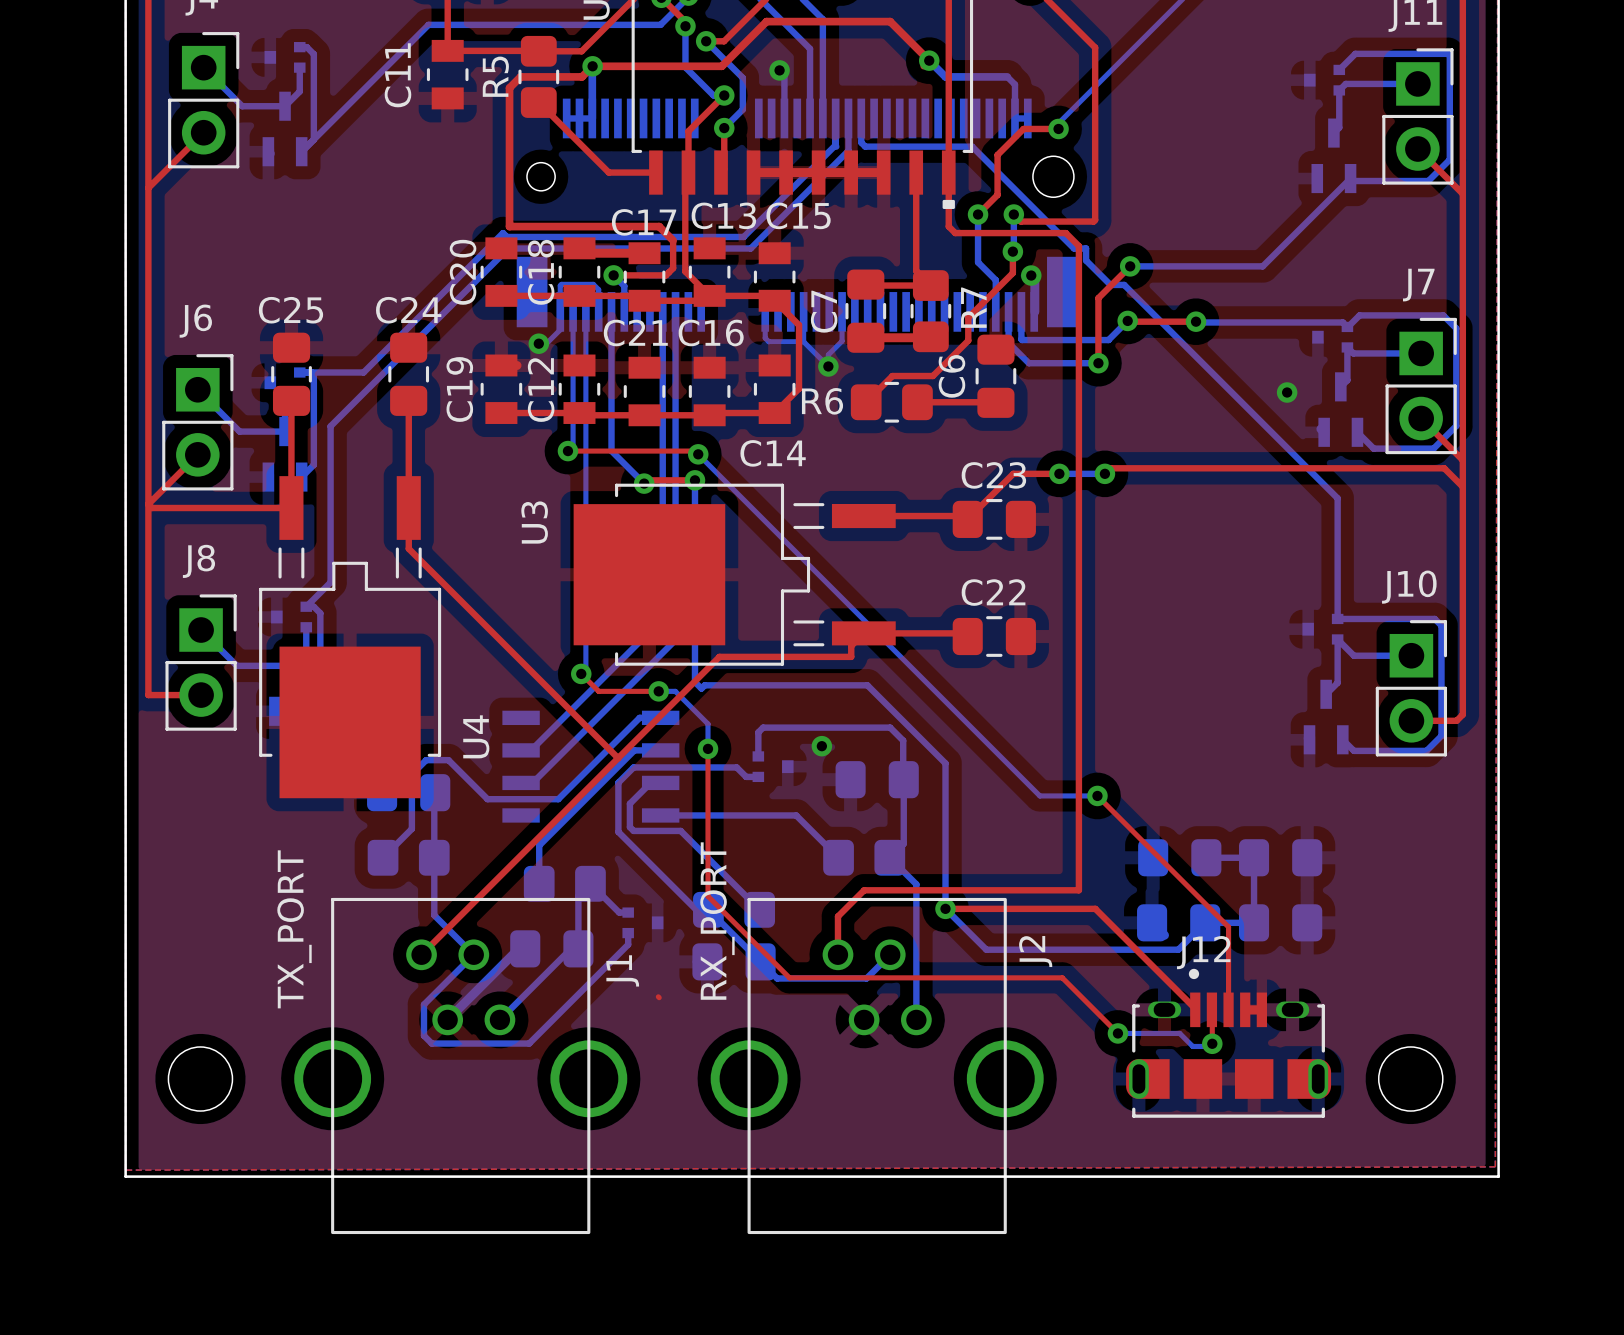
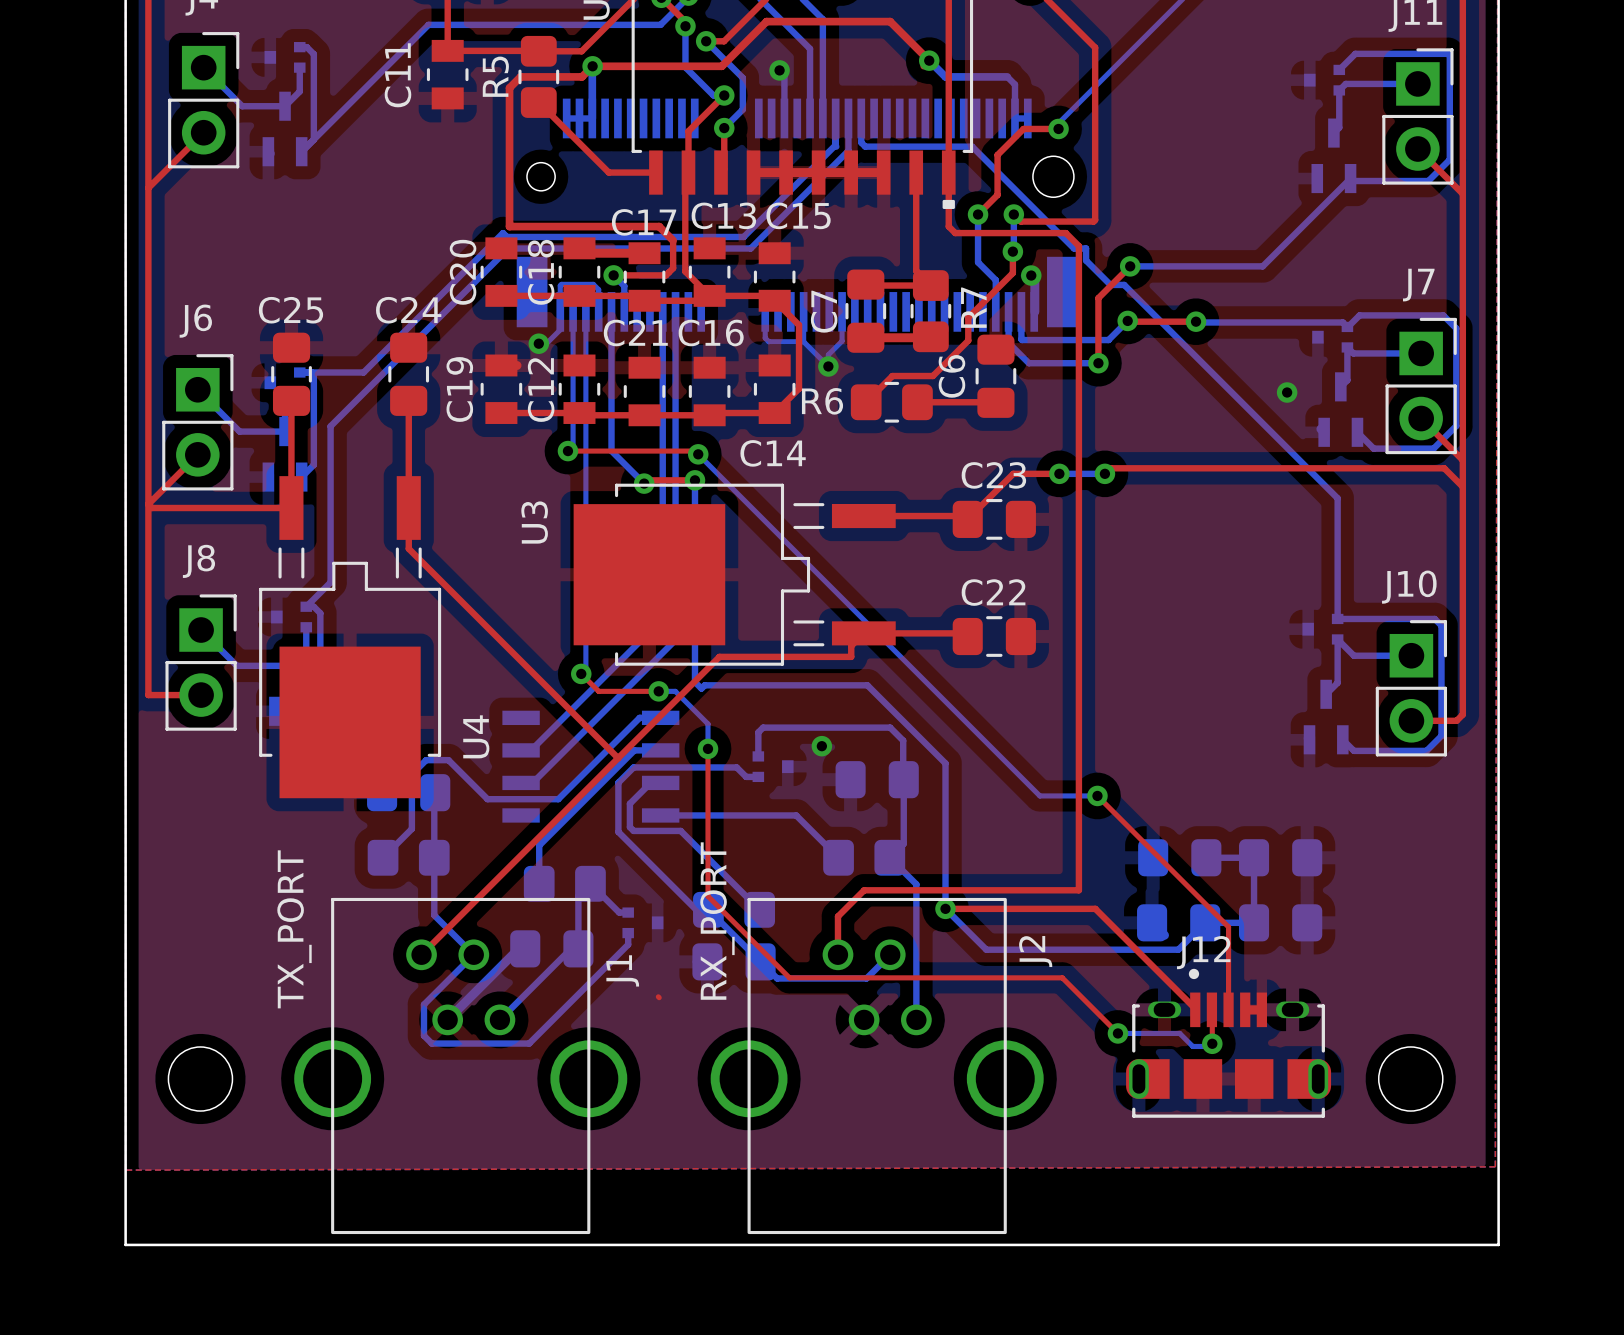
board edge: (125, 1176) (1498, 1176) -> (125, 1176) (125, 1244) (1498, 1244) (1498, 1176)

